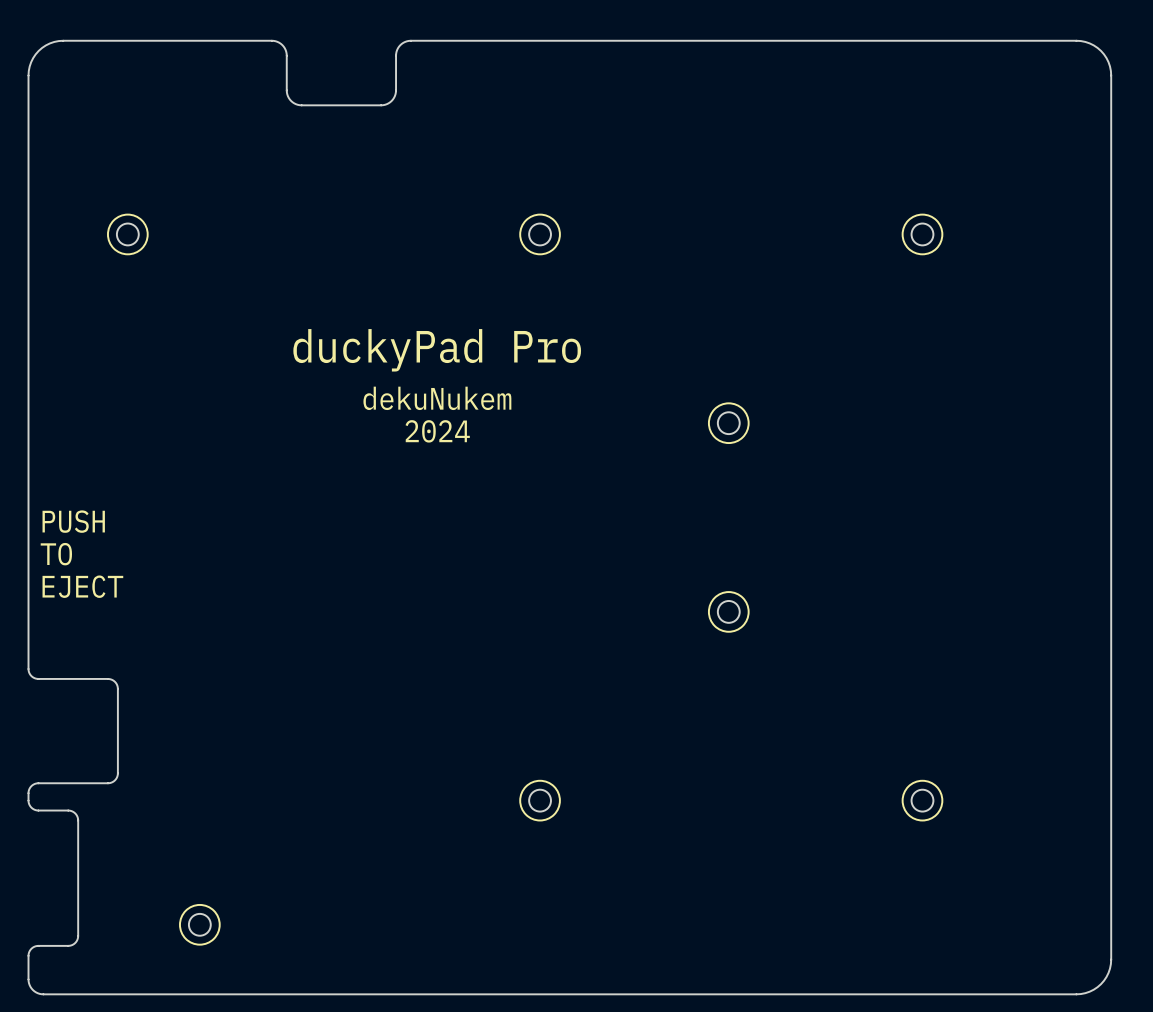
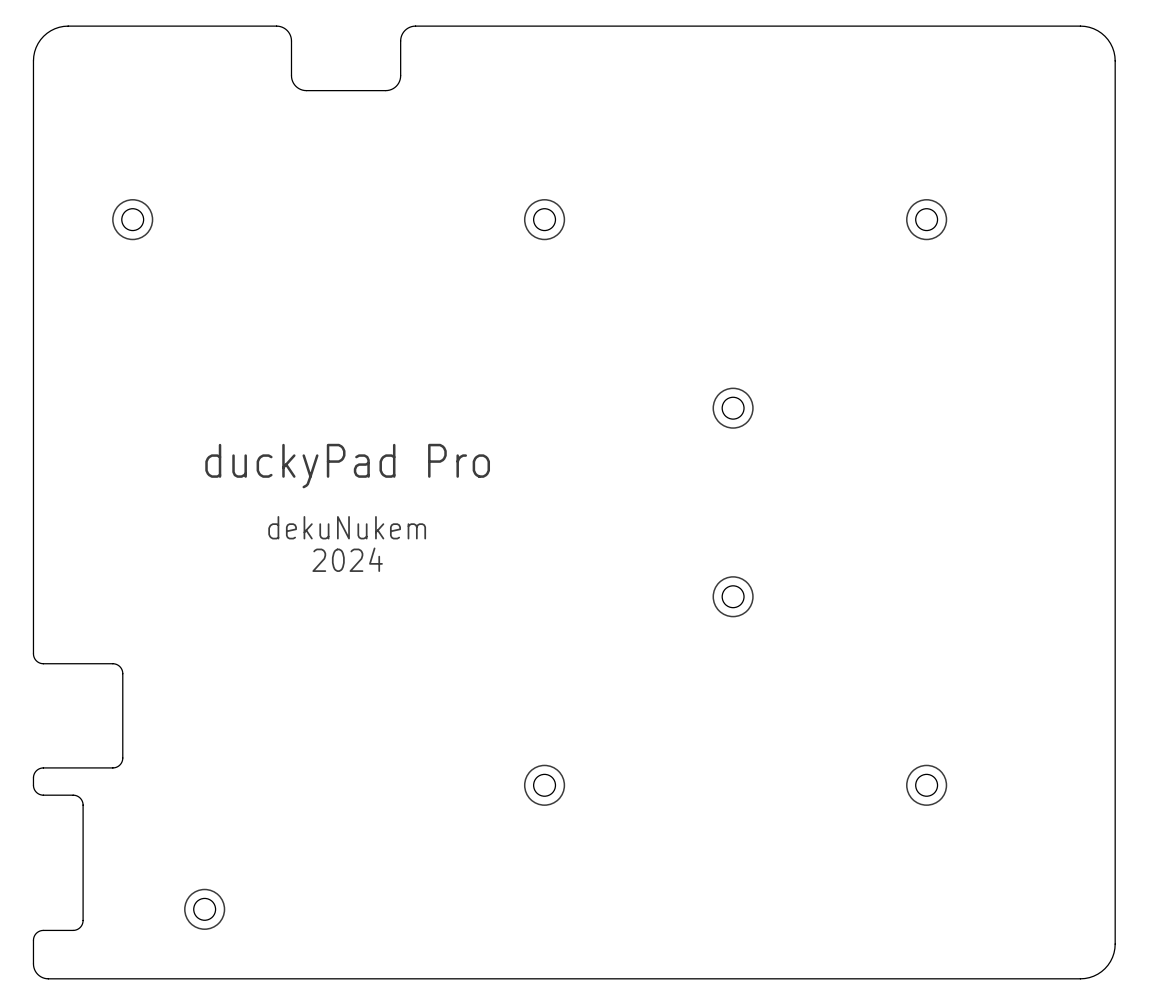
text position: duckyPad Pro (437, 350) -> duckyPad Pro (347, 466)
text position: dekuNukem (437, 398) -> dekuNukem (347, 527)
text position: 2024 (437, 431) -> 2024 (347, 559)
text: PUSH (73, 521) -> none
text: TO (56, 554) -> none
text: EJECT (82, 586) -> none

